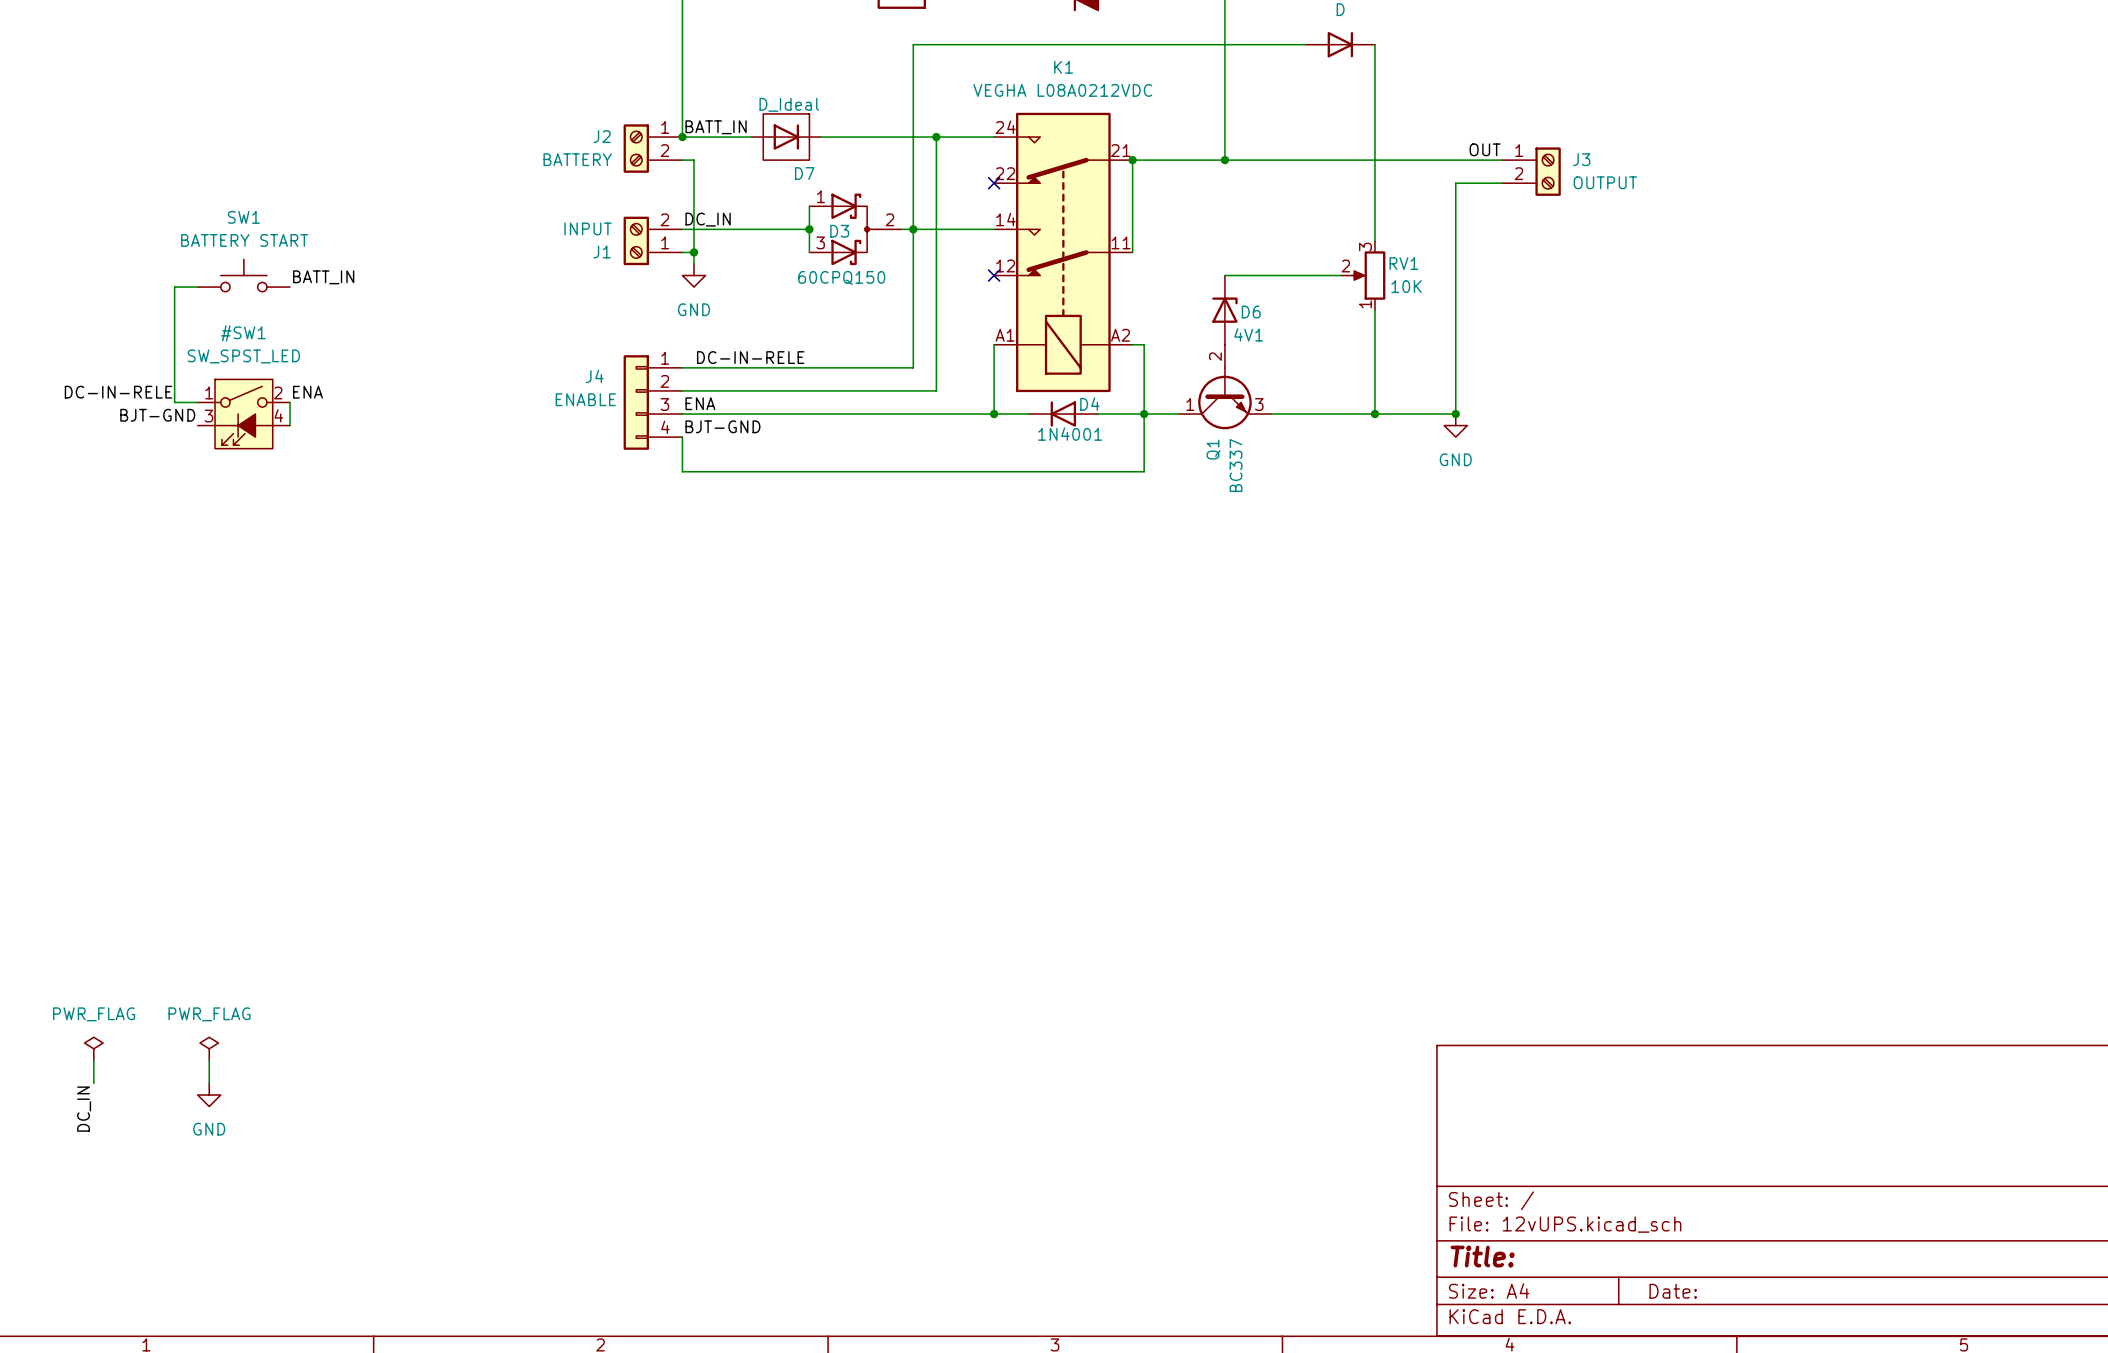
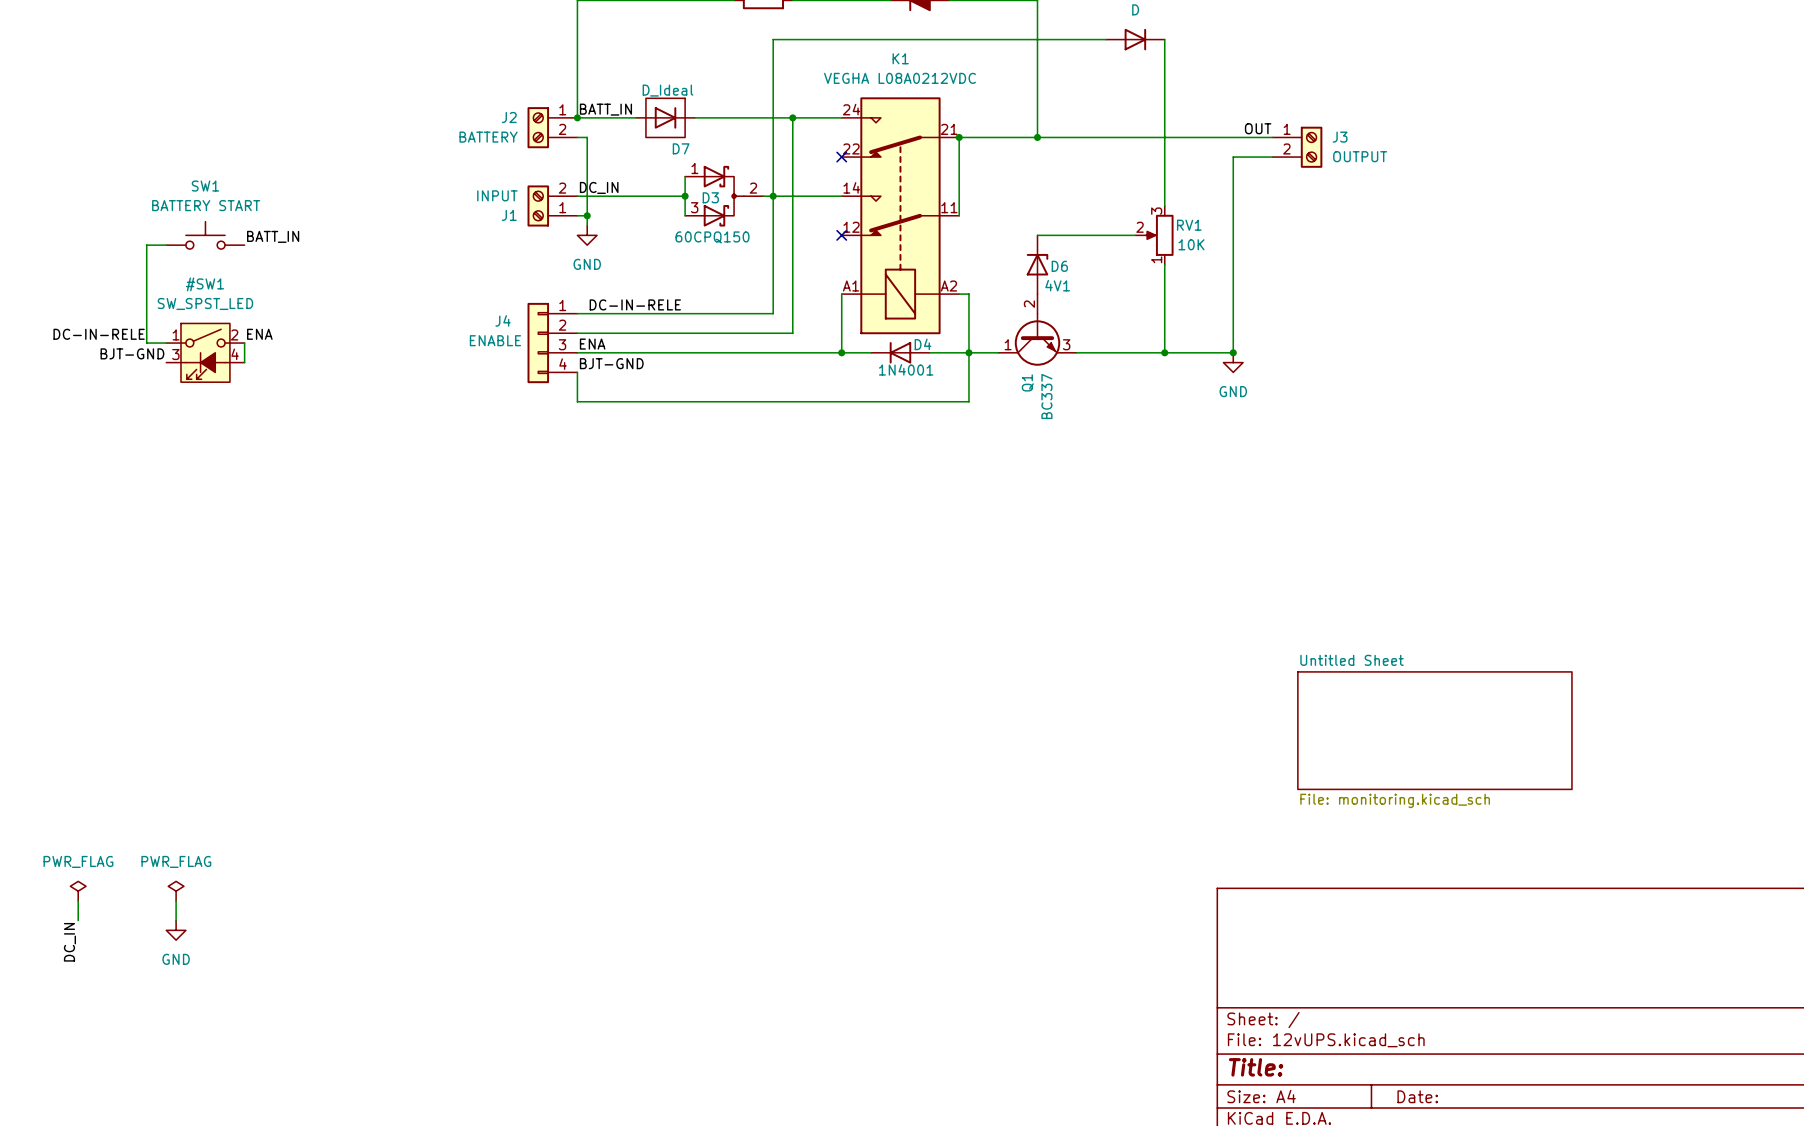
sheet Untitled Sheet: none -> File: monitoring.kicad_sch (1434, 730)

